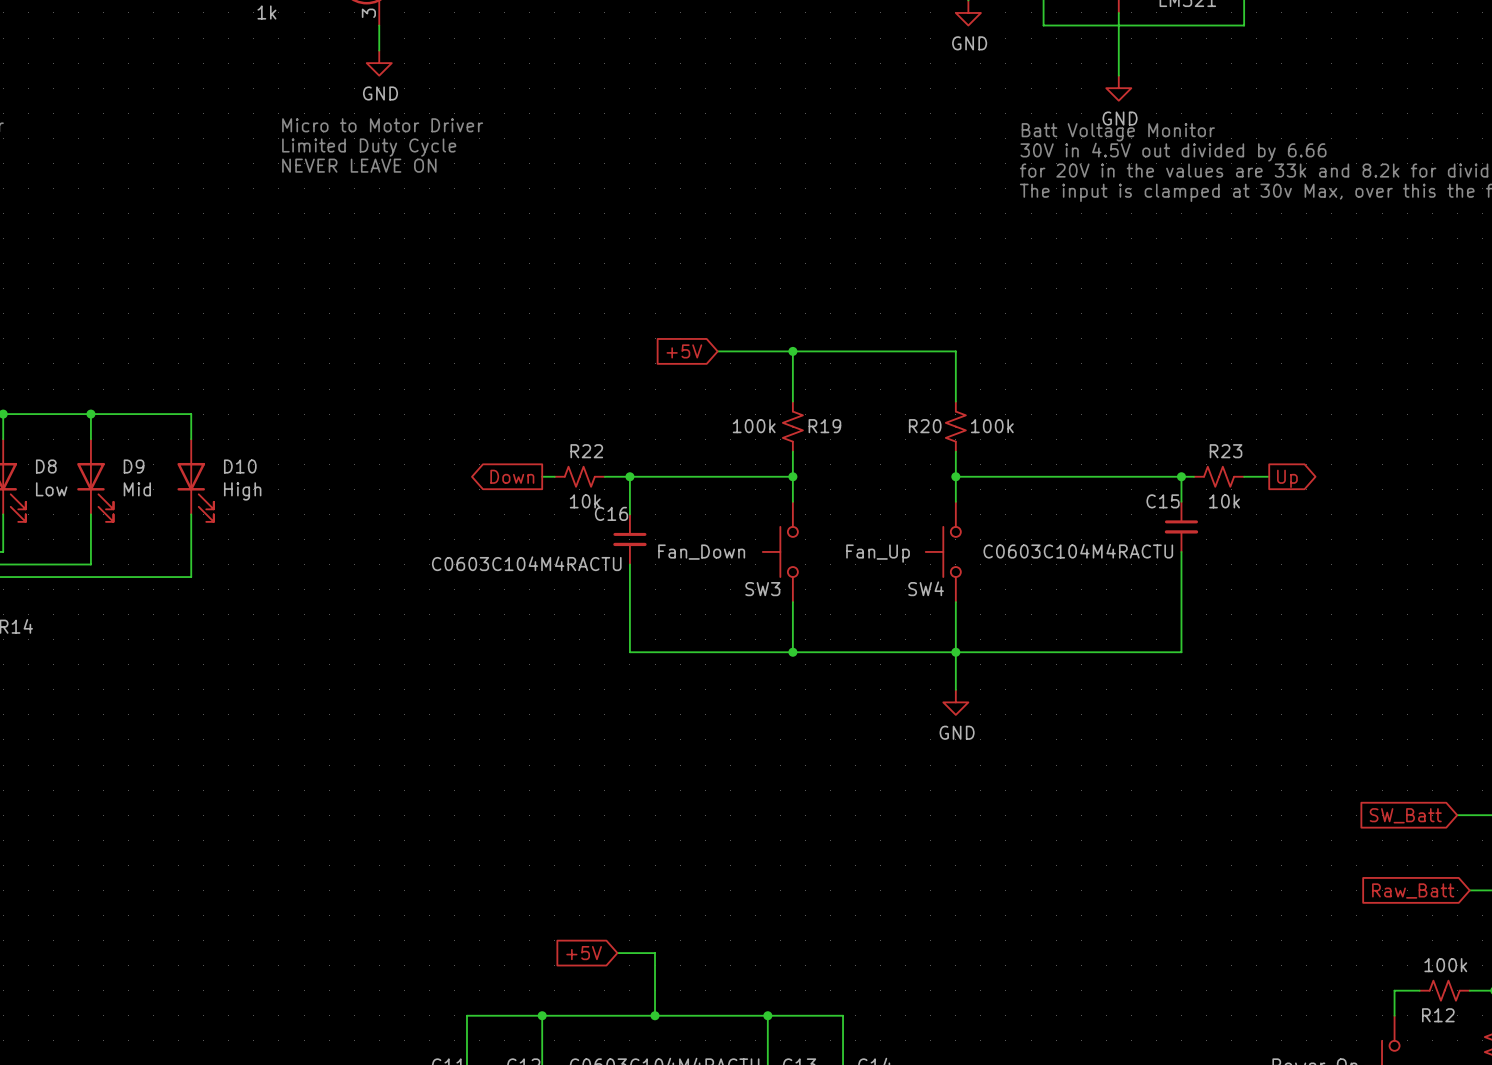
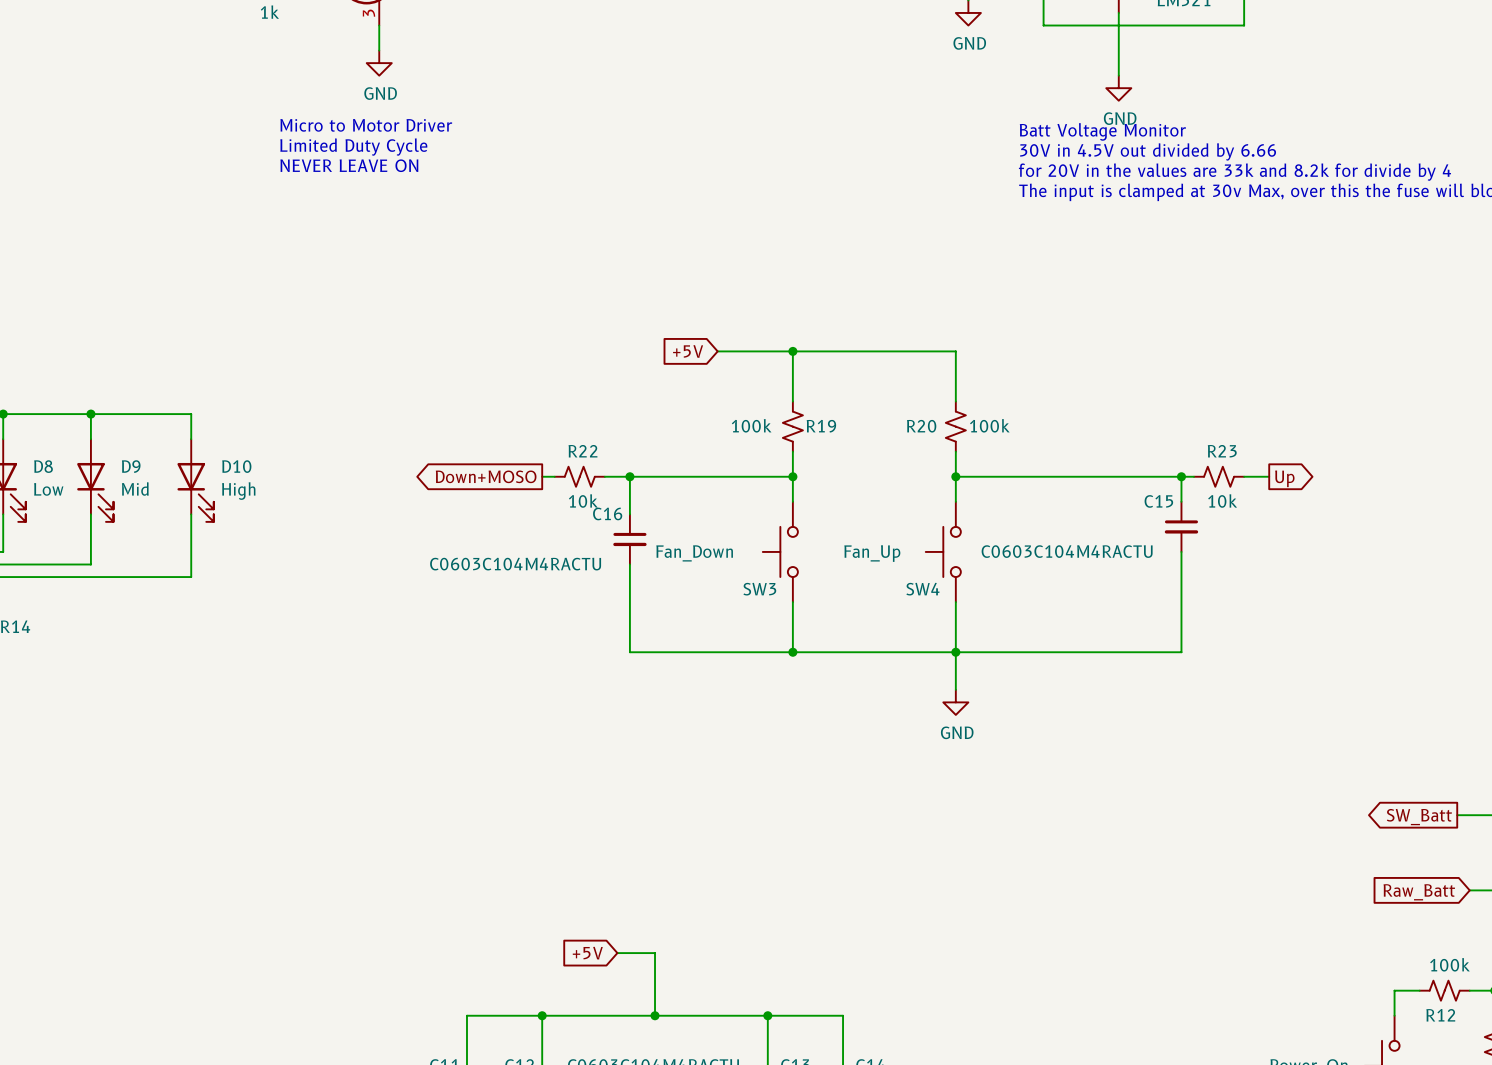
global label: Down (512, 476) -> Down+MOSO (486, 476)
global label shape: input (1405, 815) -> output (1419, 817)

